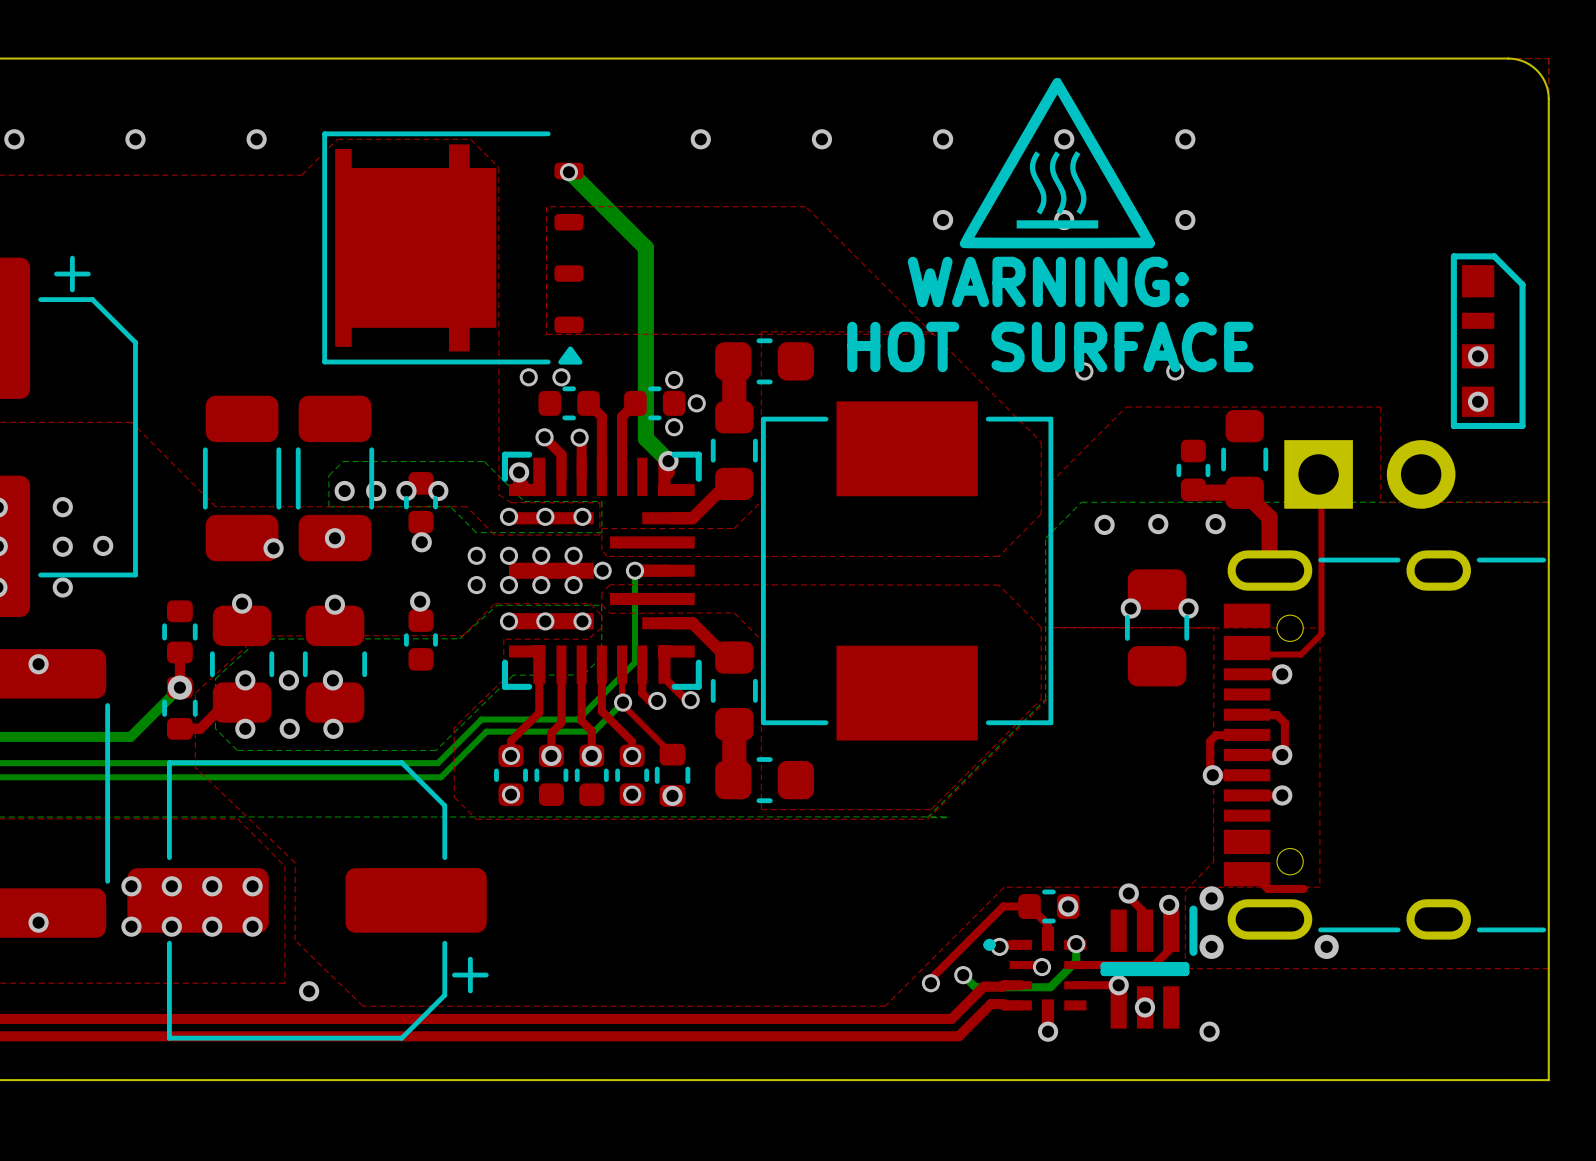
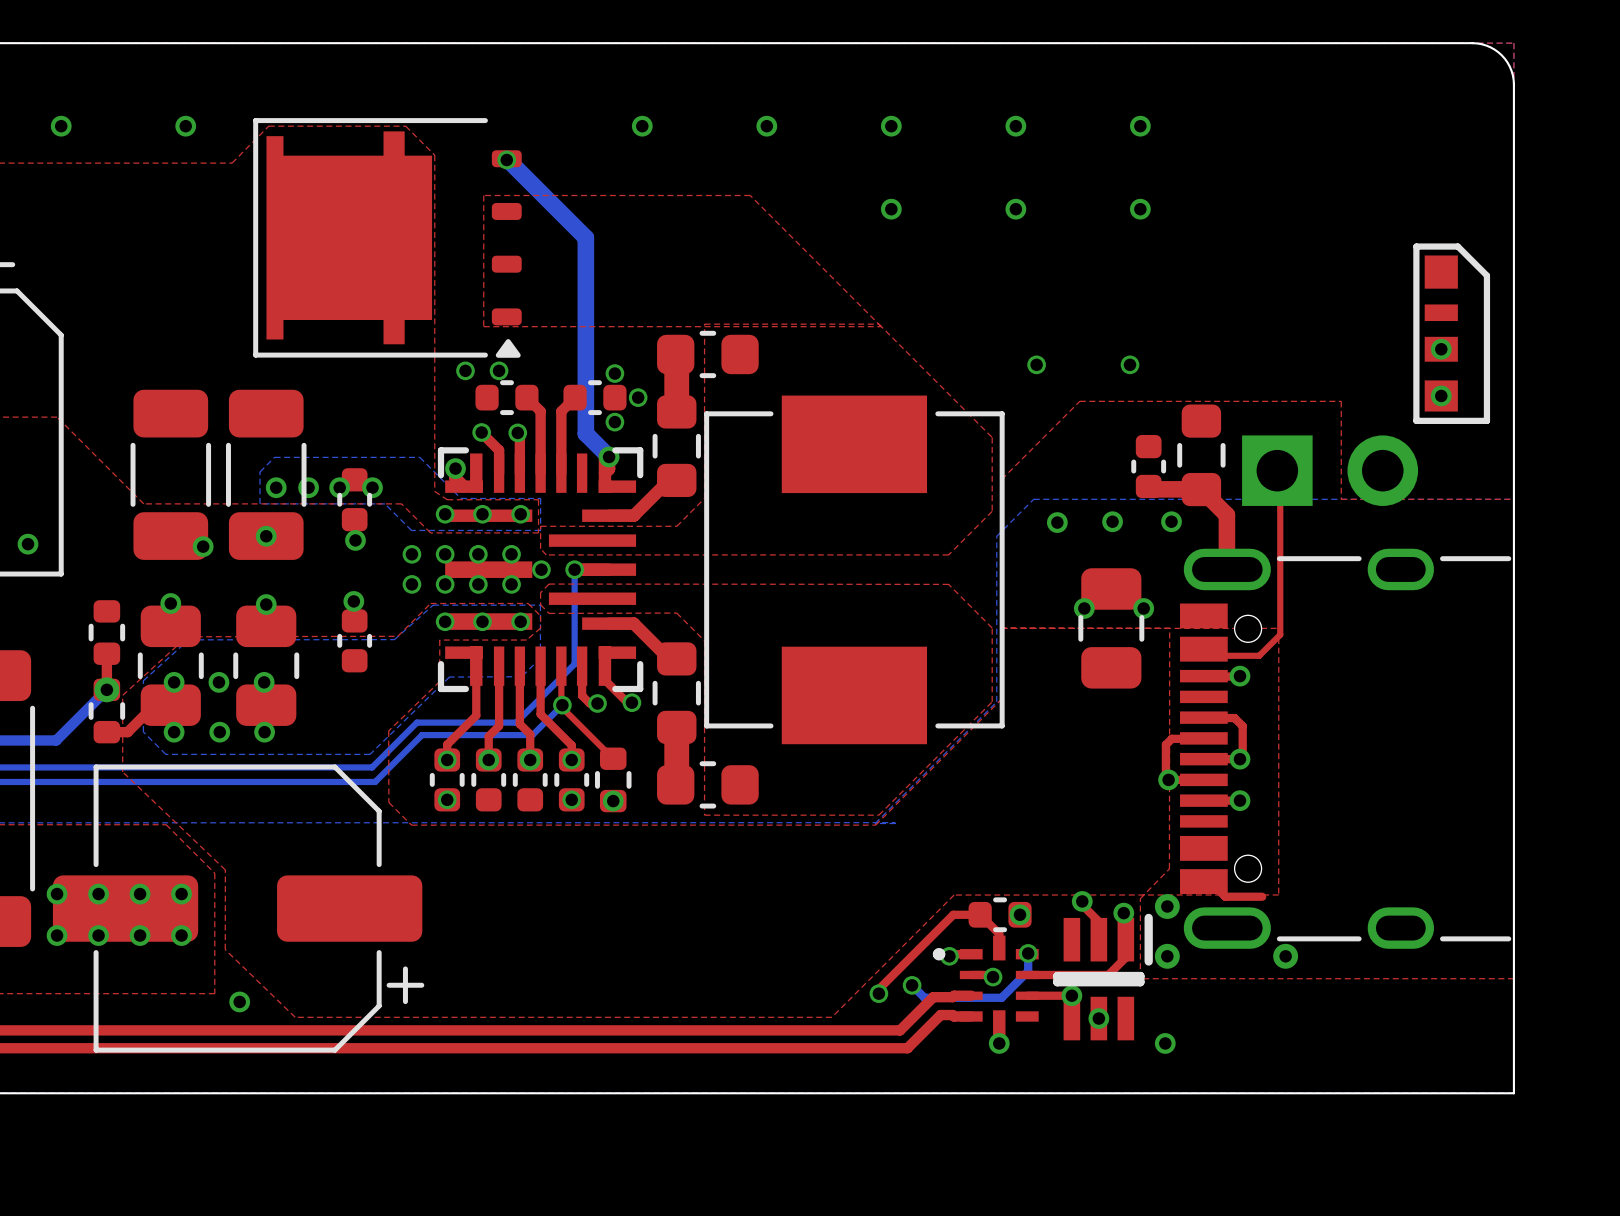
drawing: [959, 77, 1156, 249] -> none
text: WARNING: (1048, 281) -> none
text: HOT SURFACE (1050, 346) -> none

